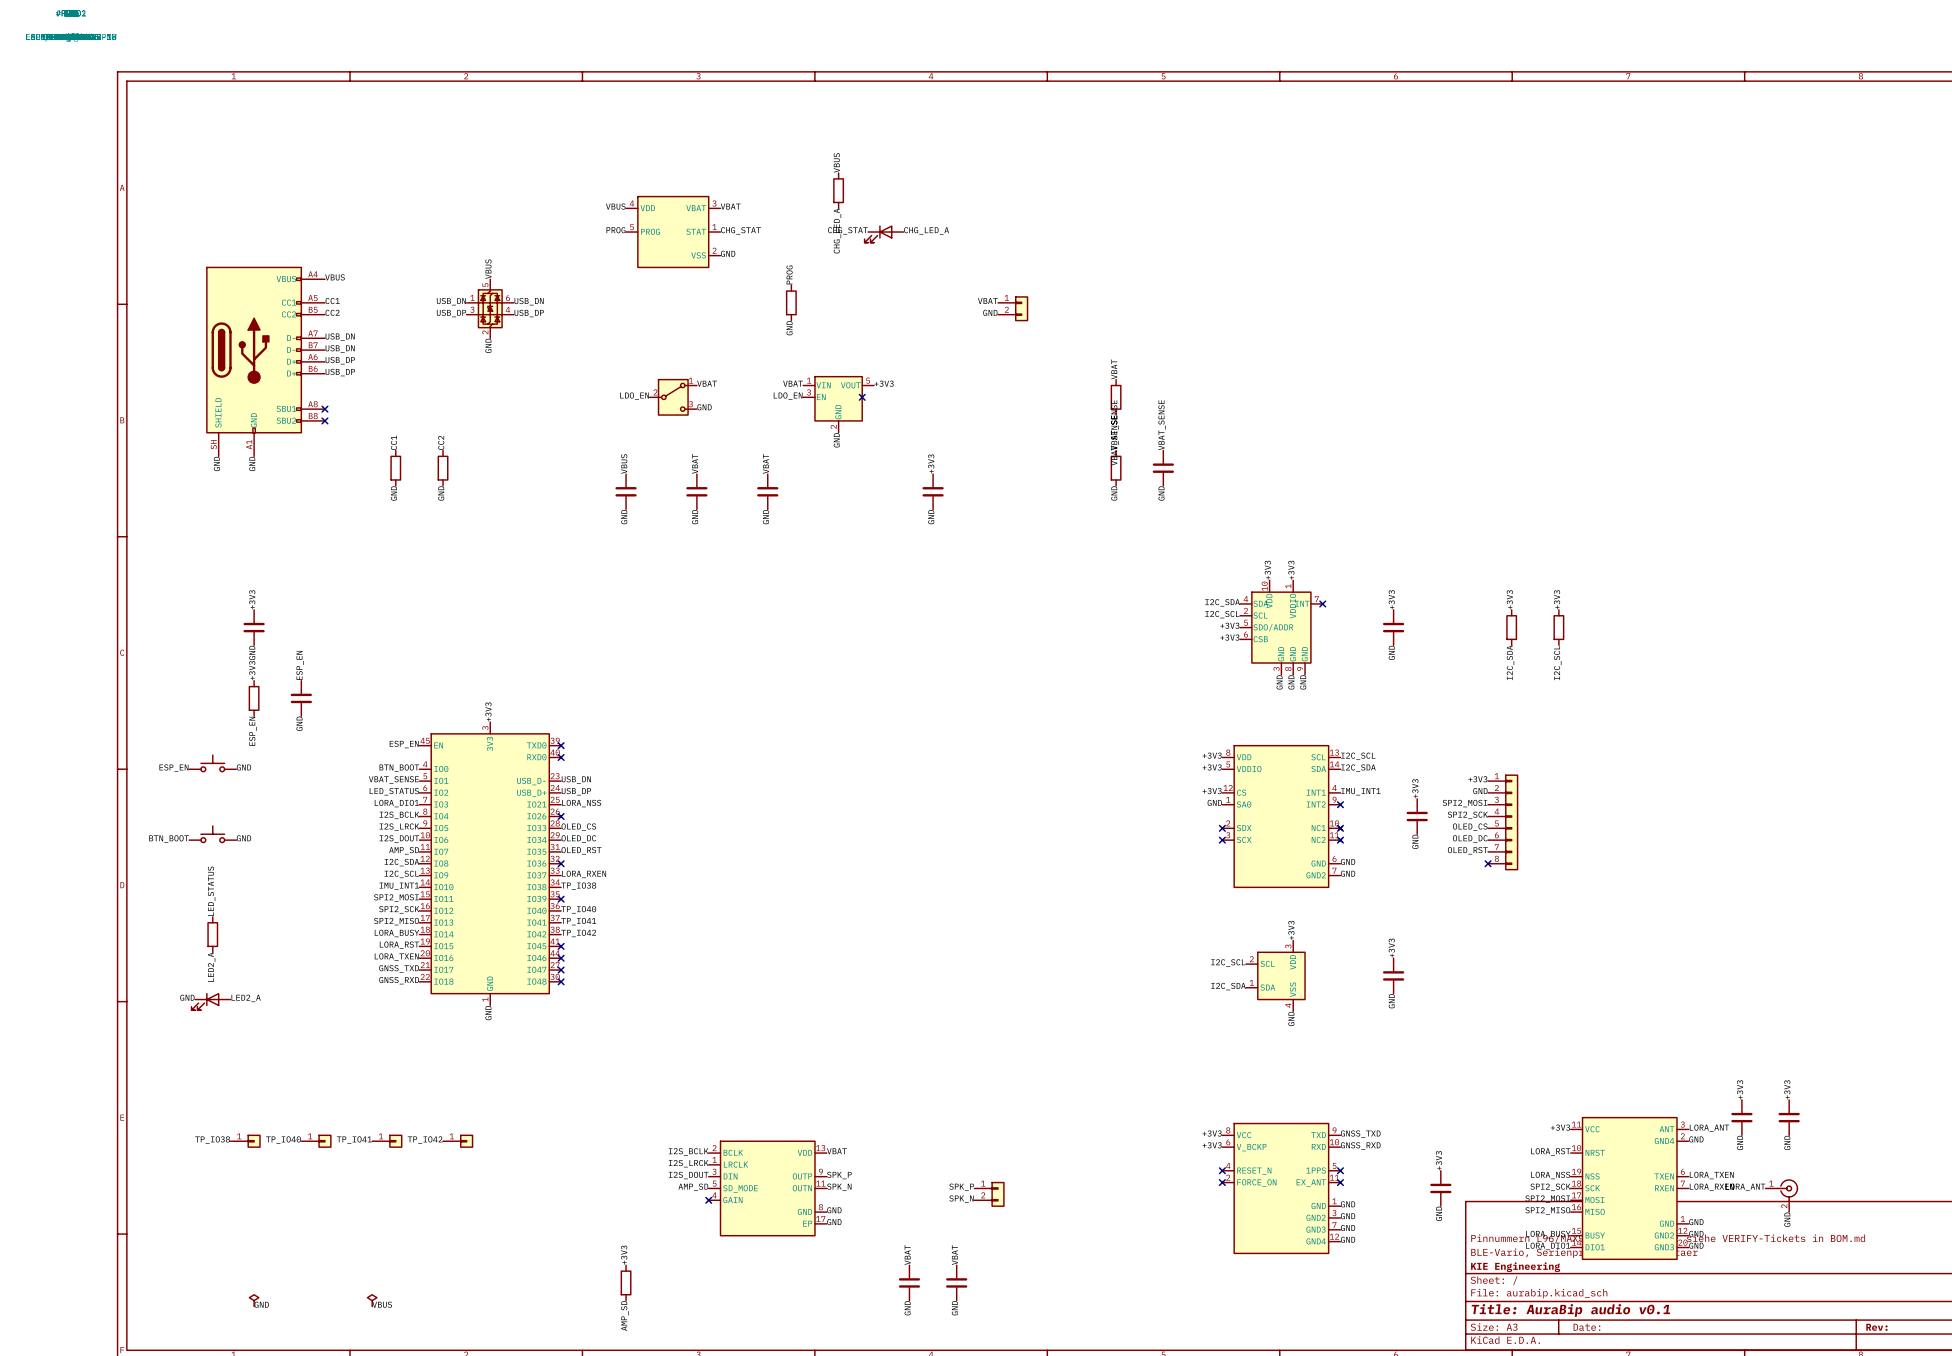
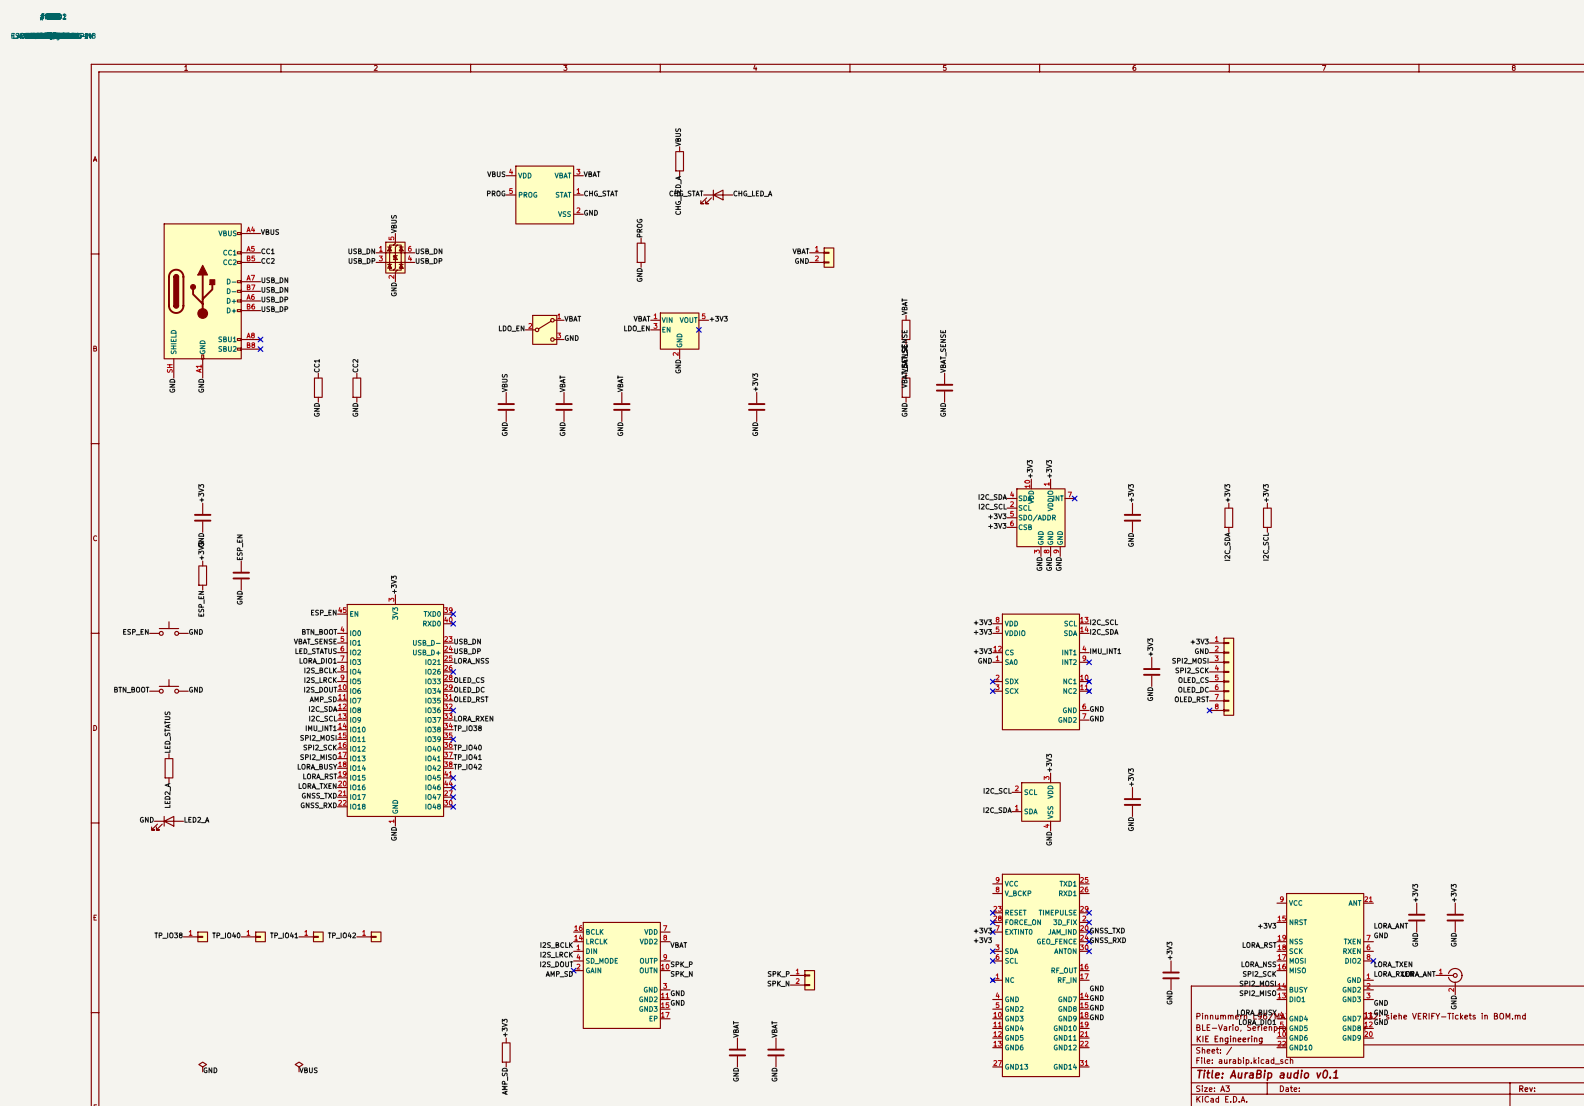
no-connect mark: none -> (992, 912)
no-connect mark: none -> (1089, 912)
part symbol: [1570, 1117, 1689, 1260] -> [1277, 893, 1374, 1058]
part symbol: [1222, 1122, 1341, 1255] -> [991, 873, 1090, 1078]
no-connect mark: none -> (992, 922)
no-connect mark: none -> (1089, 922)
no-connect mark: none -> (992, 932)
no-connect mark: none -> (1089, 932)
part symbol: [708, 1140, 827, 1237] -> [573, 921, 671, 1029]
no-connect mark: none -> (1089, 941)
no-connect mark: none -> (992, 951)
no-connect mark: none -> (1089, 951)
no-connect mark: (1340, 1170) -> none
no-connect mark: none -> (1373, 960)
no-connect mark: (1222, 1182) -> none
no-connect mark: (1340, 1182) -> none
no-connect mark: none -> (992, 980)
no-connect mark position: (708, 1200) -> (573, 970)

